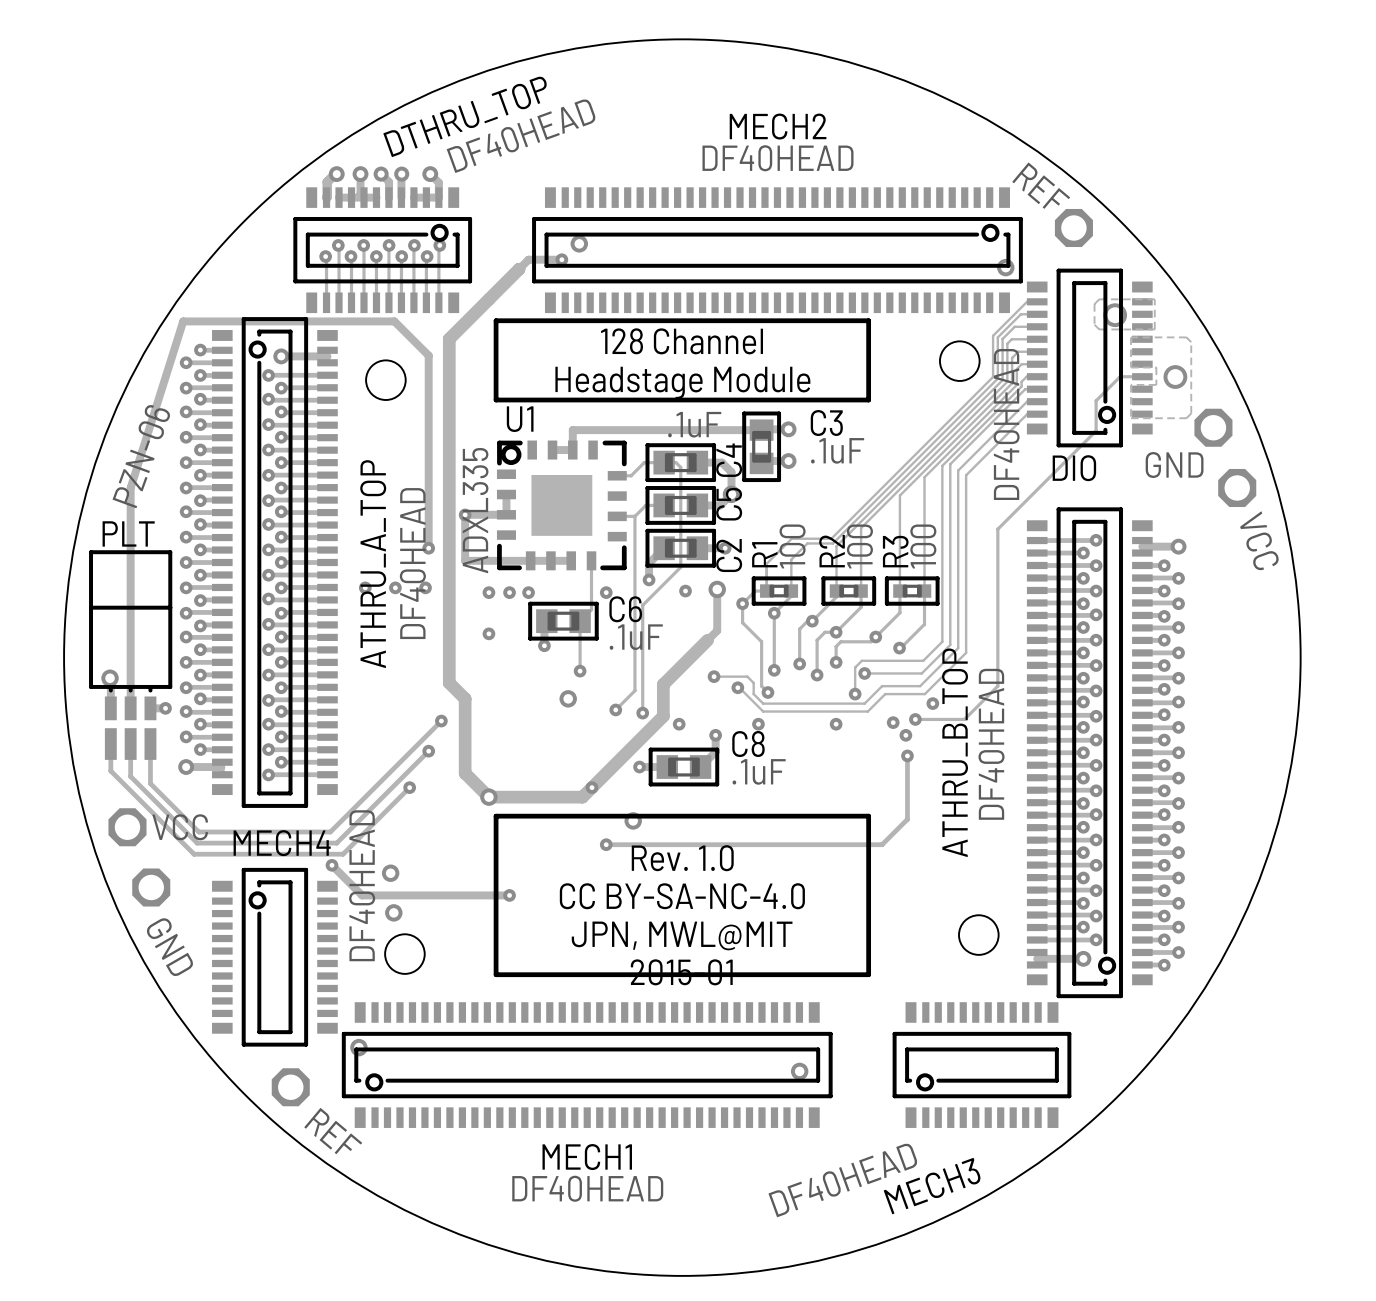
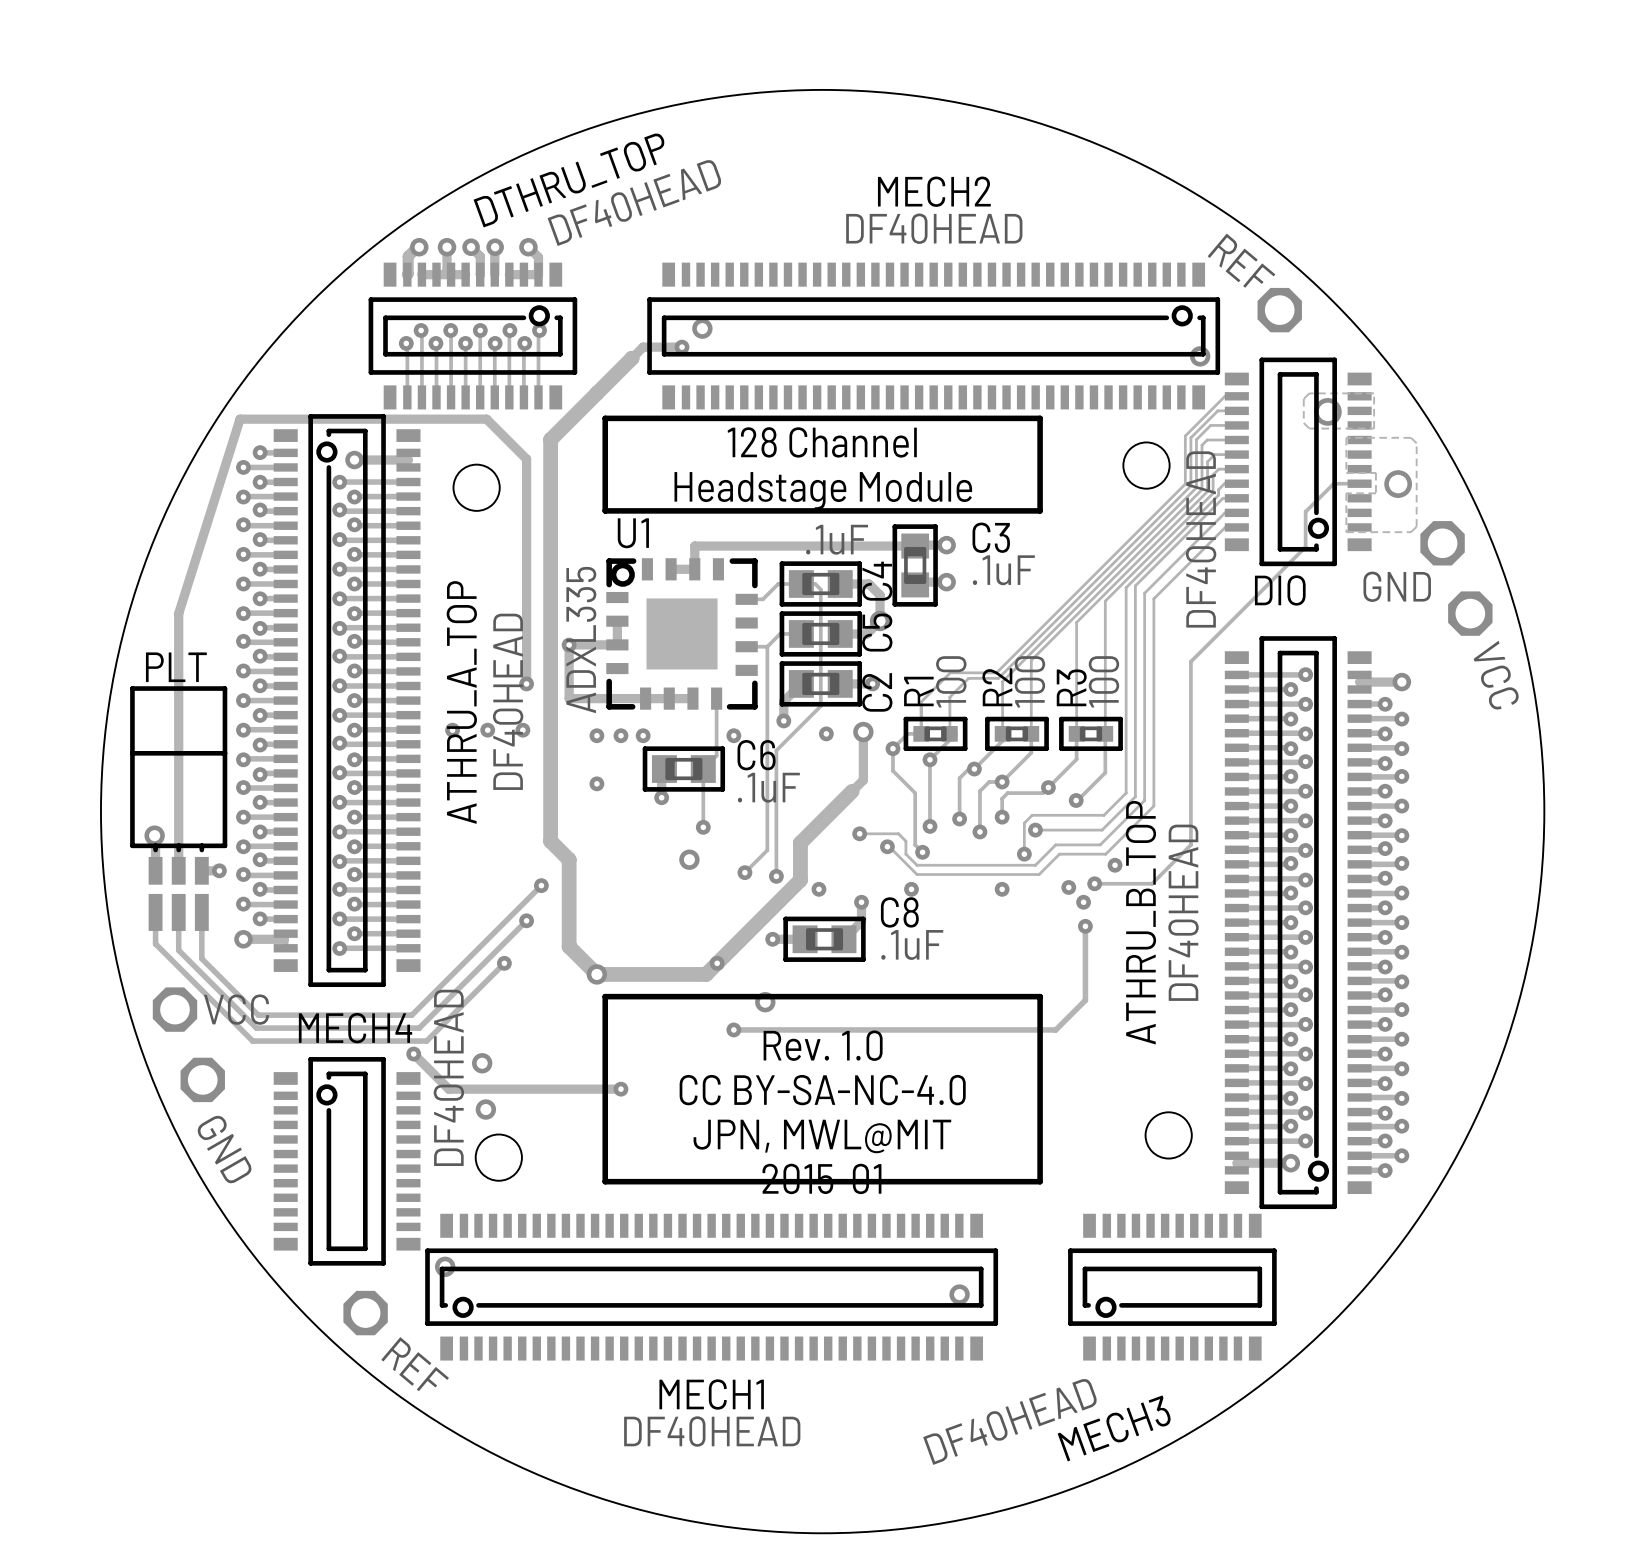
PLT value: PZN-06 (141, 456) -> none

